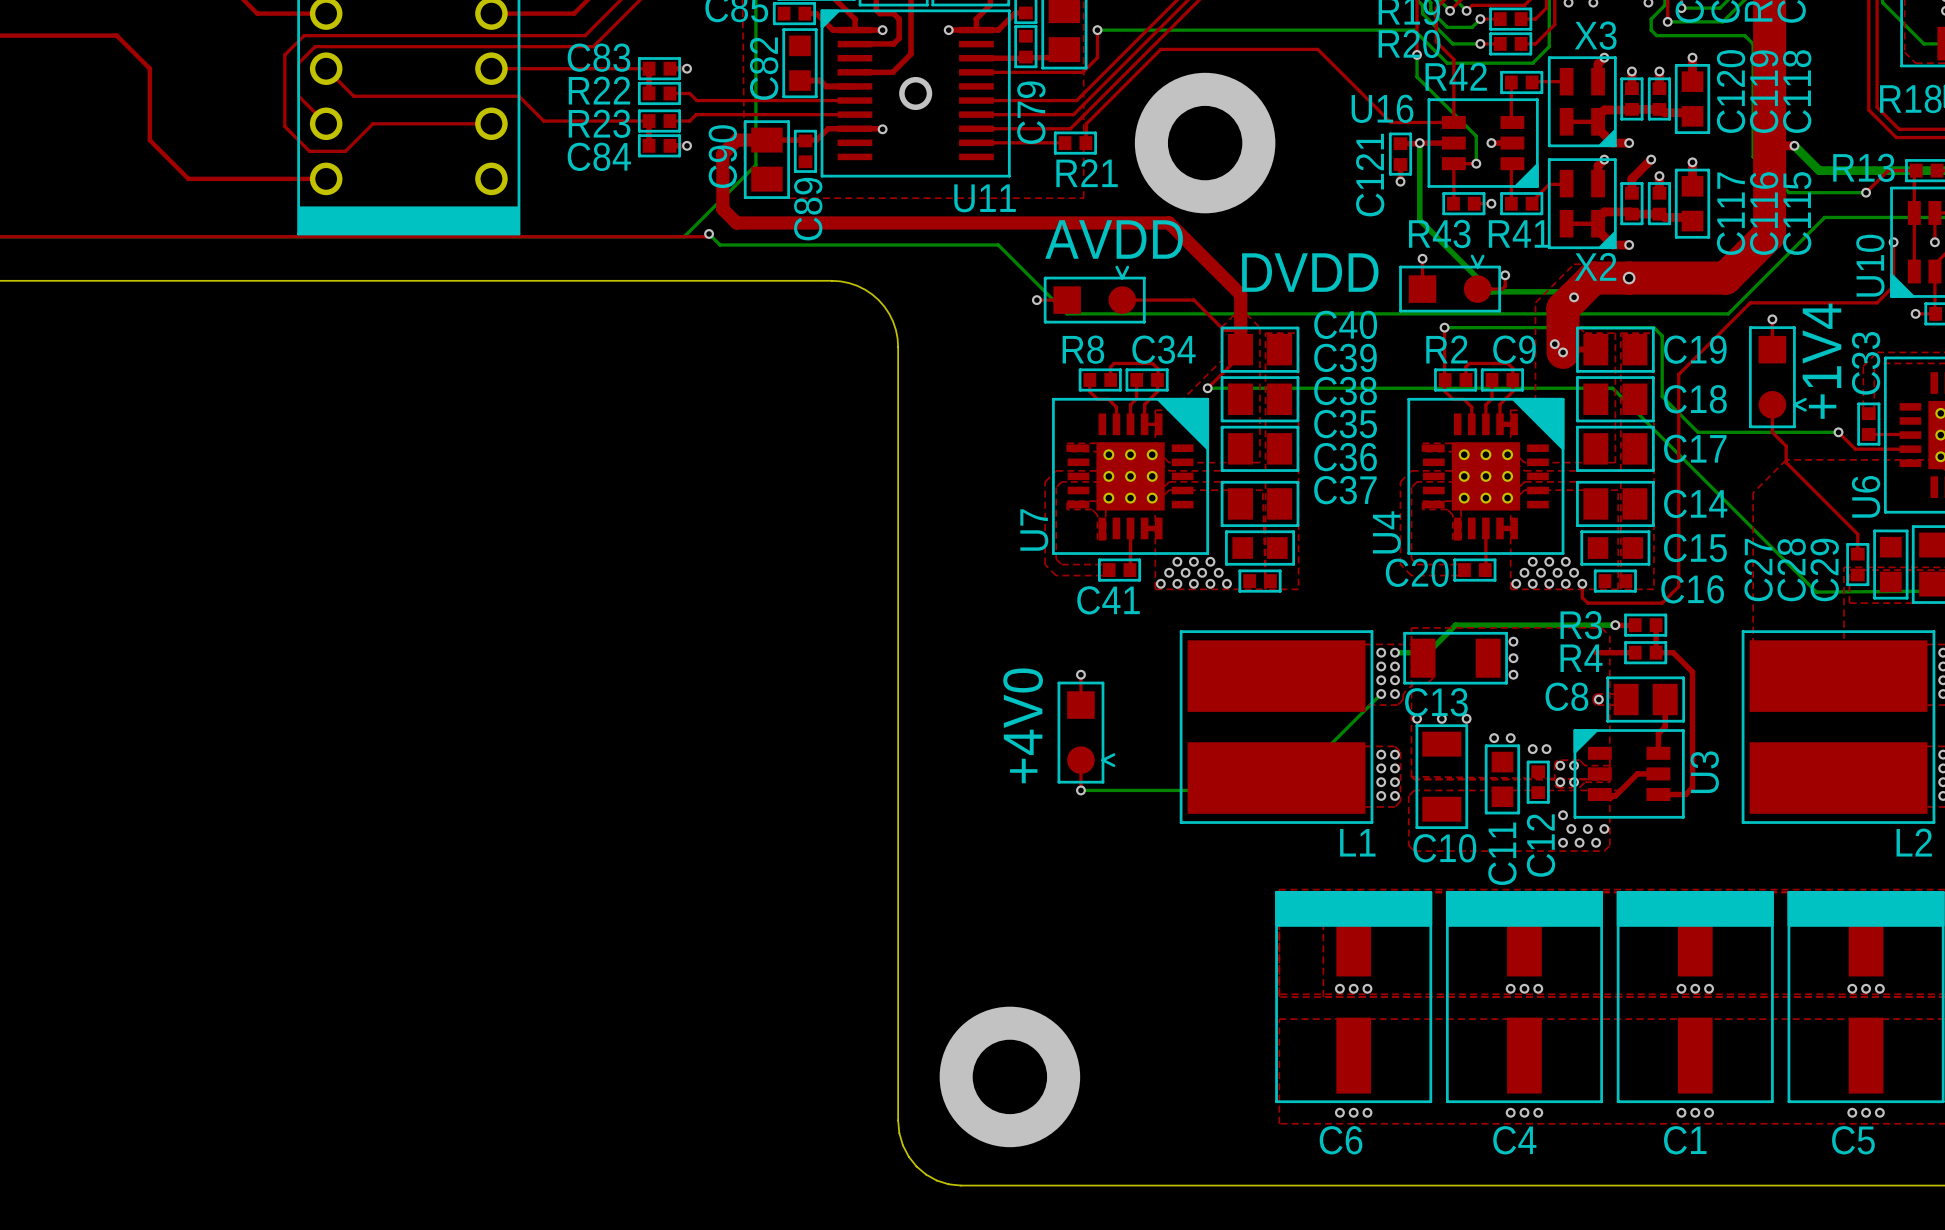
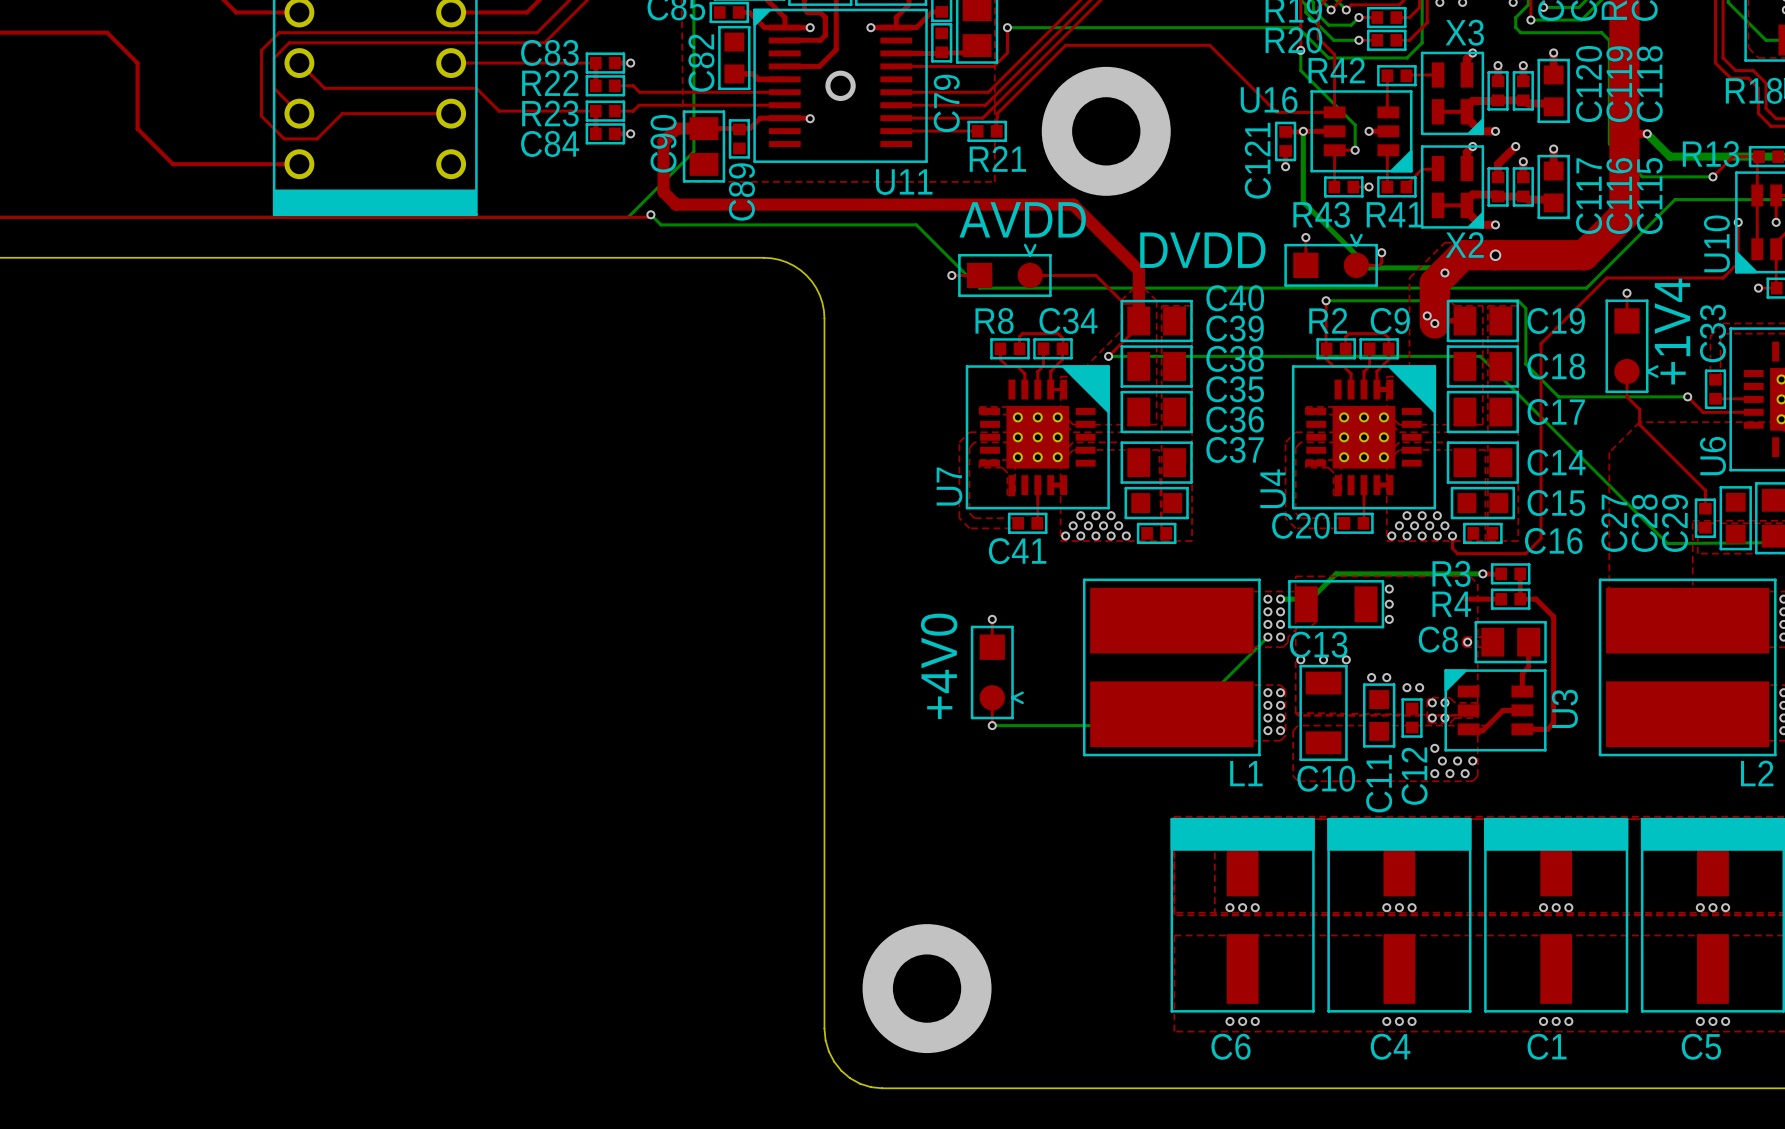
top track: (1877, 63) (1877, 107) (1899, 129) (1934, 129) -> (1723, 58) (1735, 70) (1753, 70) (1766, 83) (1766, 108) (1776, 118)
top track: (1868, 68) (1868, 110) (1896, 137) (1929, 137) -> (1715, 63) (1730, 78) (1748, 78) (1758, 88) (1758, 113) (1771, 126)

